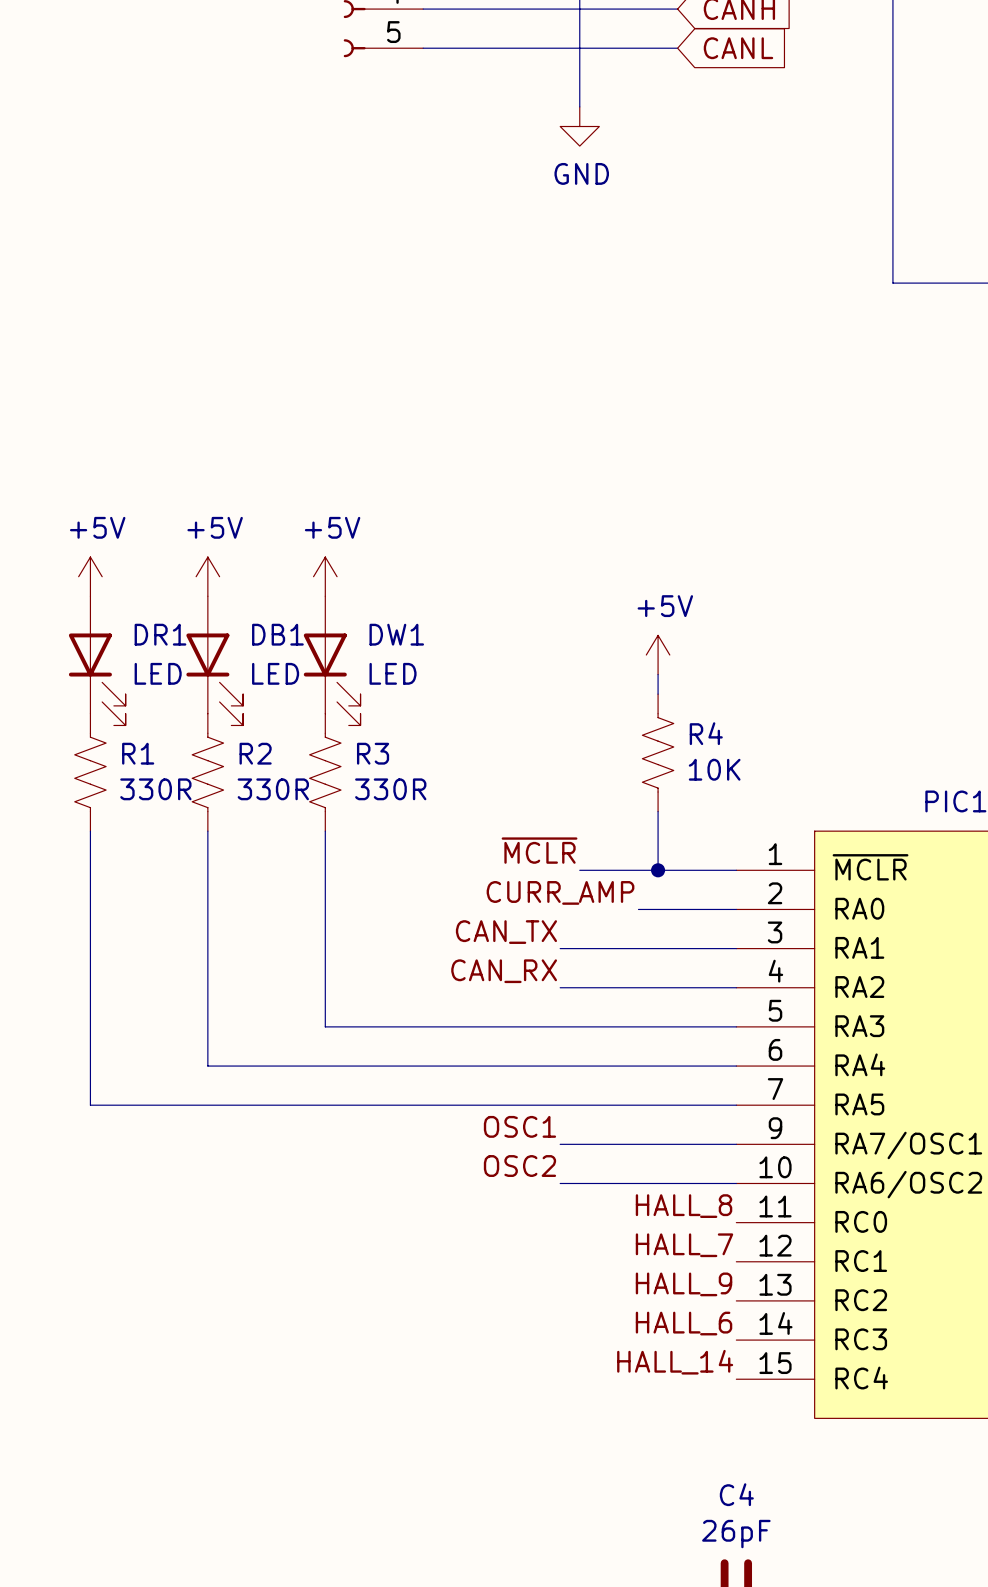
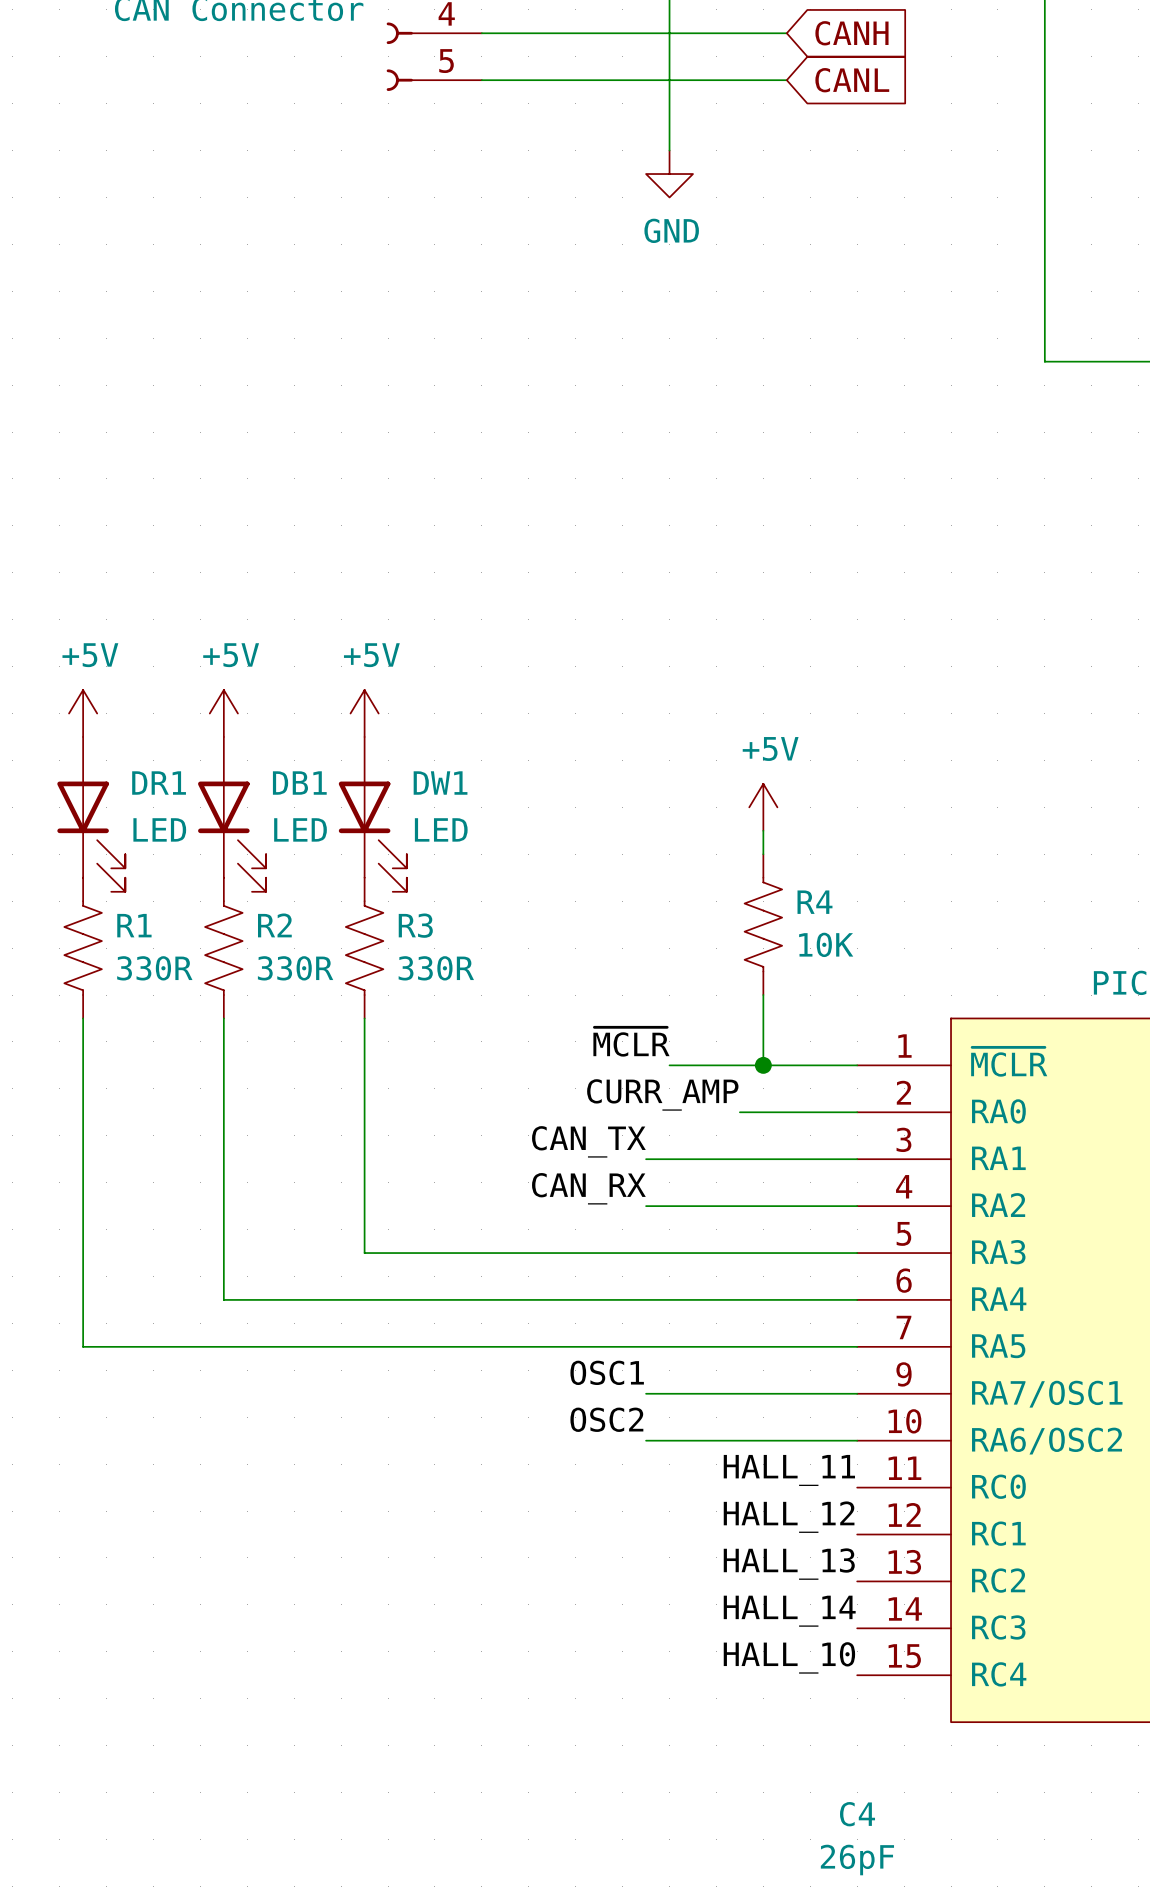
label: HALL_8 (684, 1206) -> HALL_11 (789, 1470)
label: HALL_7 (684, 1245) -> HALL_12 (789, 1517)
label: HALL_9 (684, 1284) -> HALL_13 (789, 1564)
label: HALL_6 (684, 1323) -> HALL_14 (789, 1611)
label: HALL_14 (675, 1362) -> HALL_10 (789, 1657)

